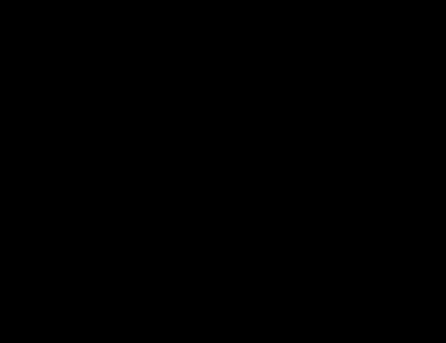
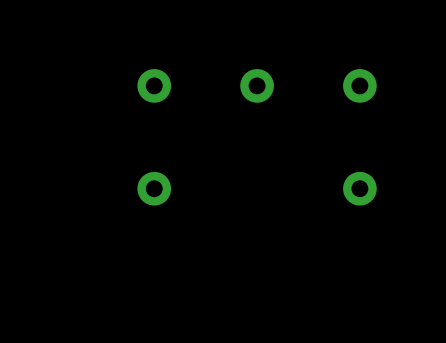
part: none -> (154, 85)
part: none -> (257, 85)
part: none -> (359, 85)
part: none -> (154, 188)
part: none -> (359, 188)

